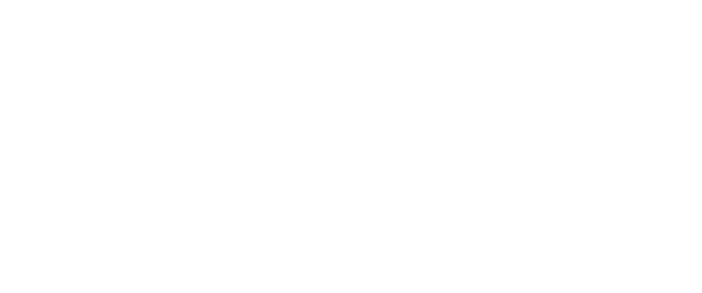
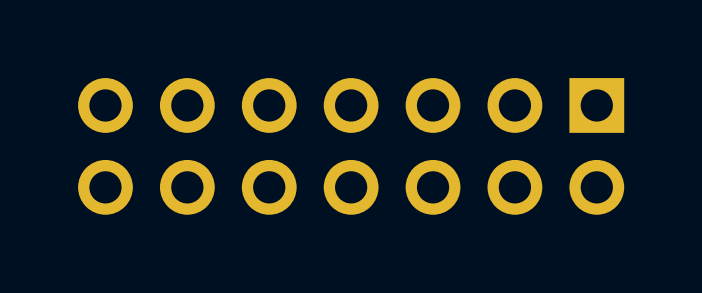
part: none -> (351, 146)

